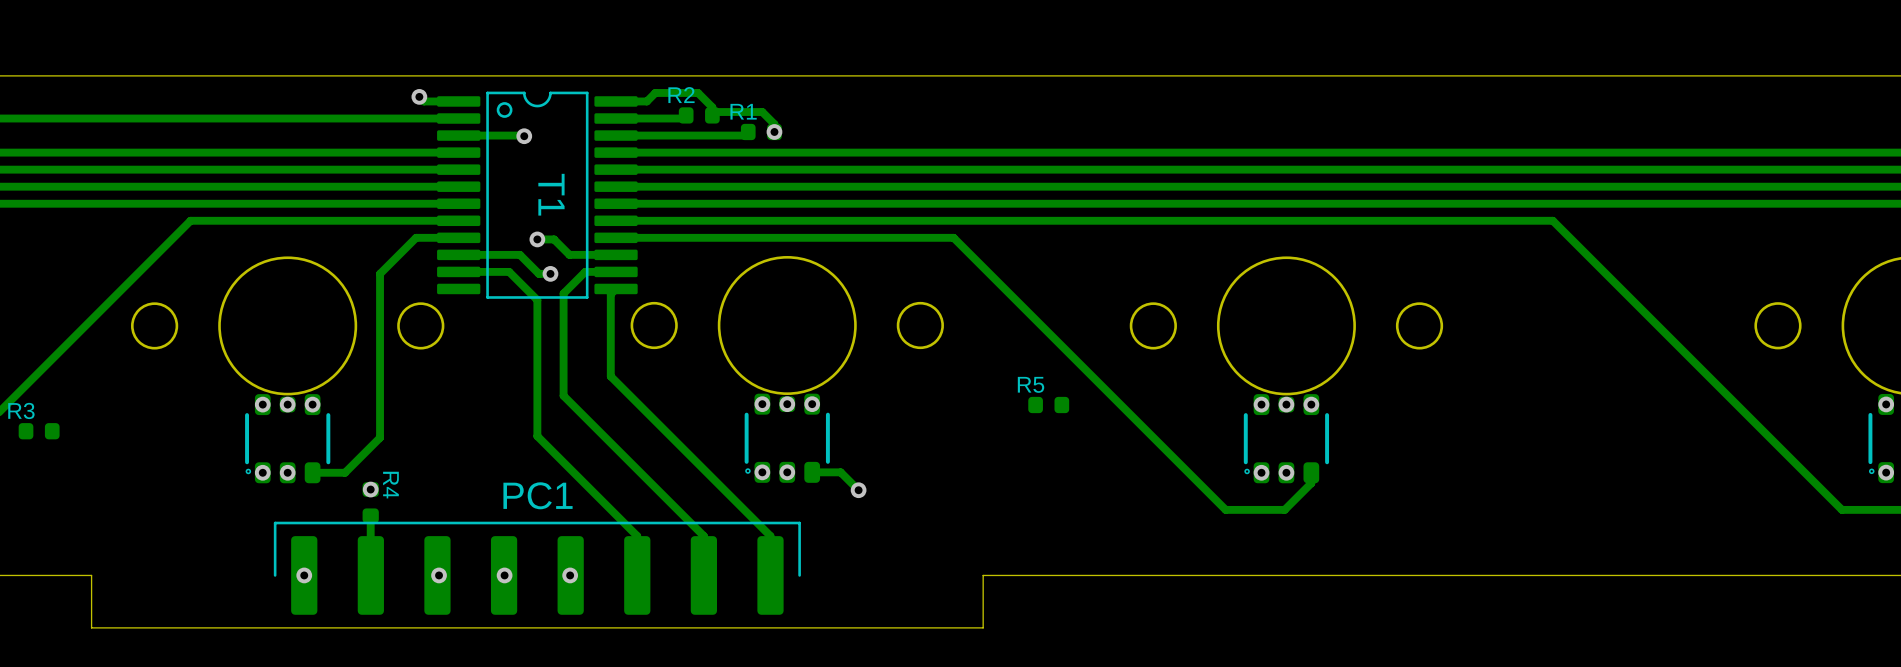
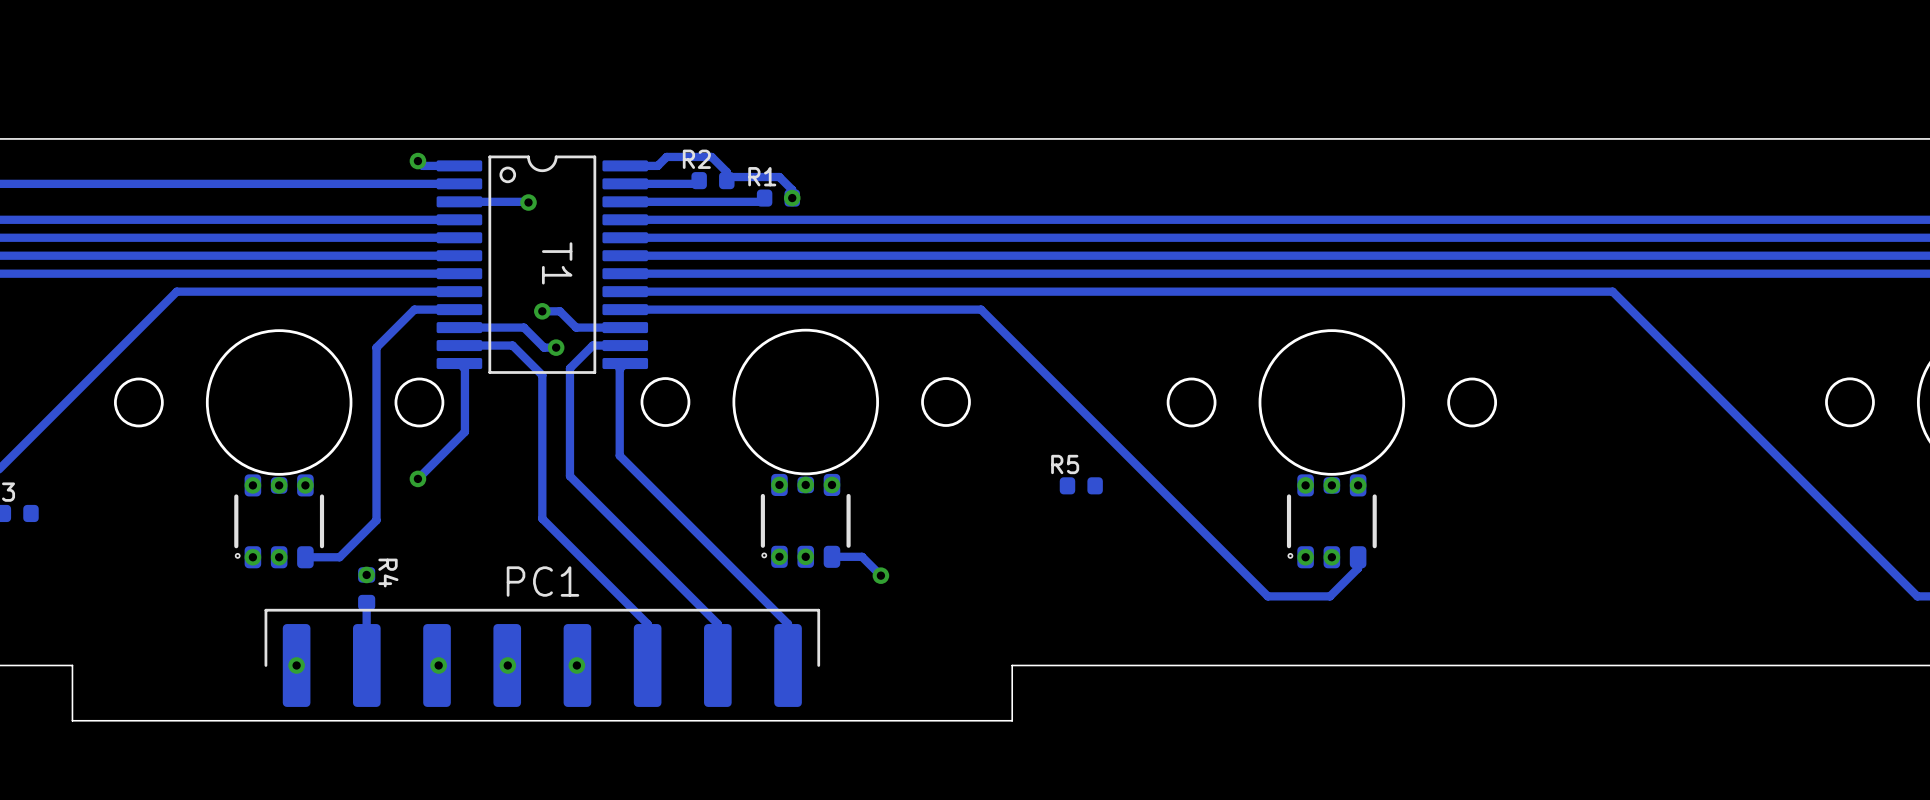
track: none -> (459, 363) (464, 369) (464, 431) (417, 478)
via: none -> (417, 478)

